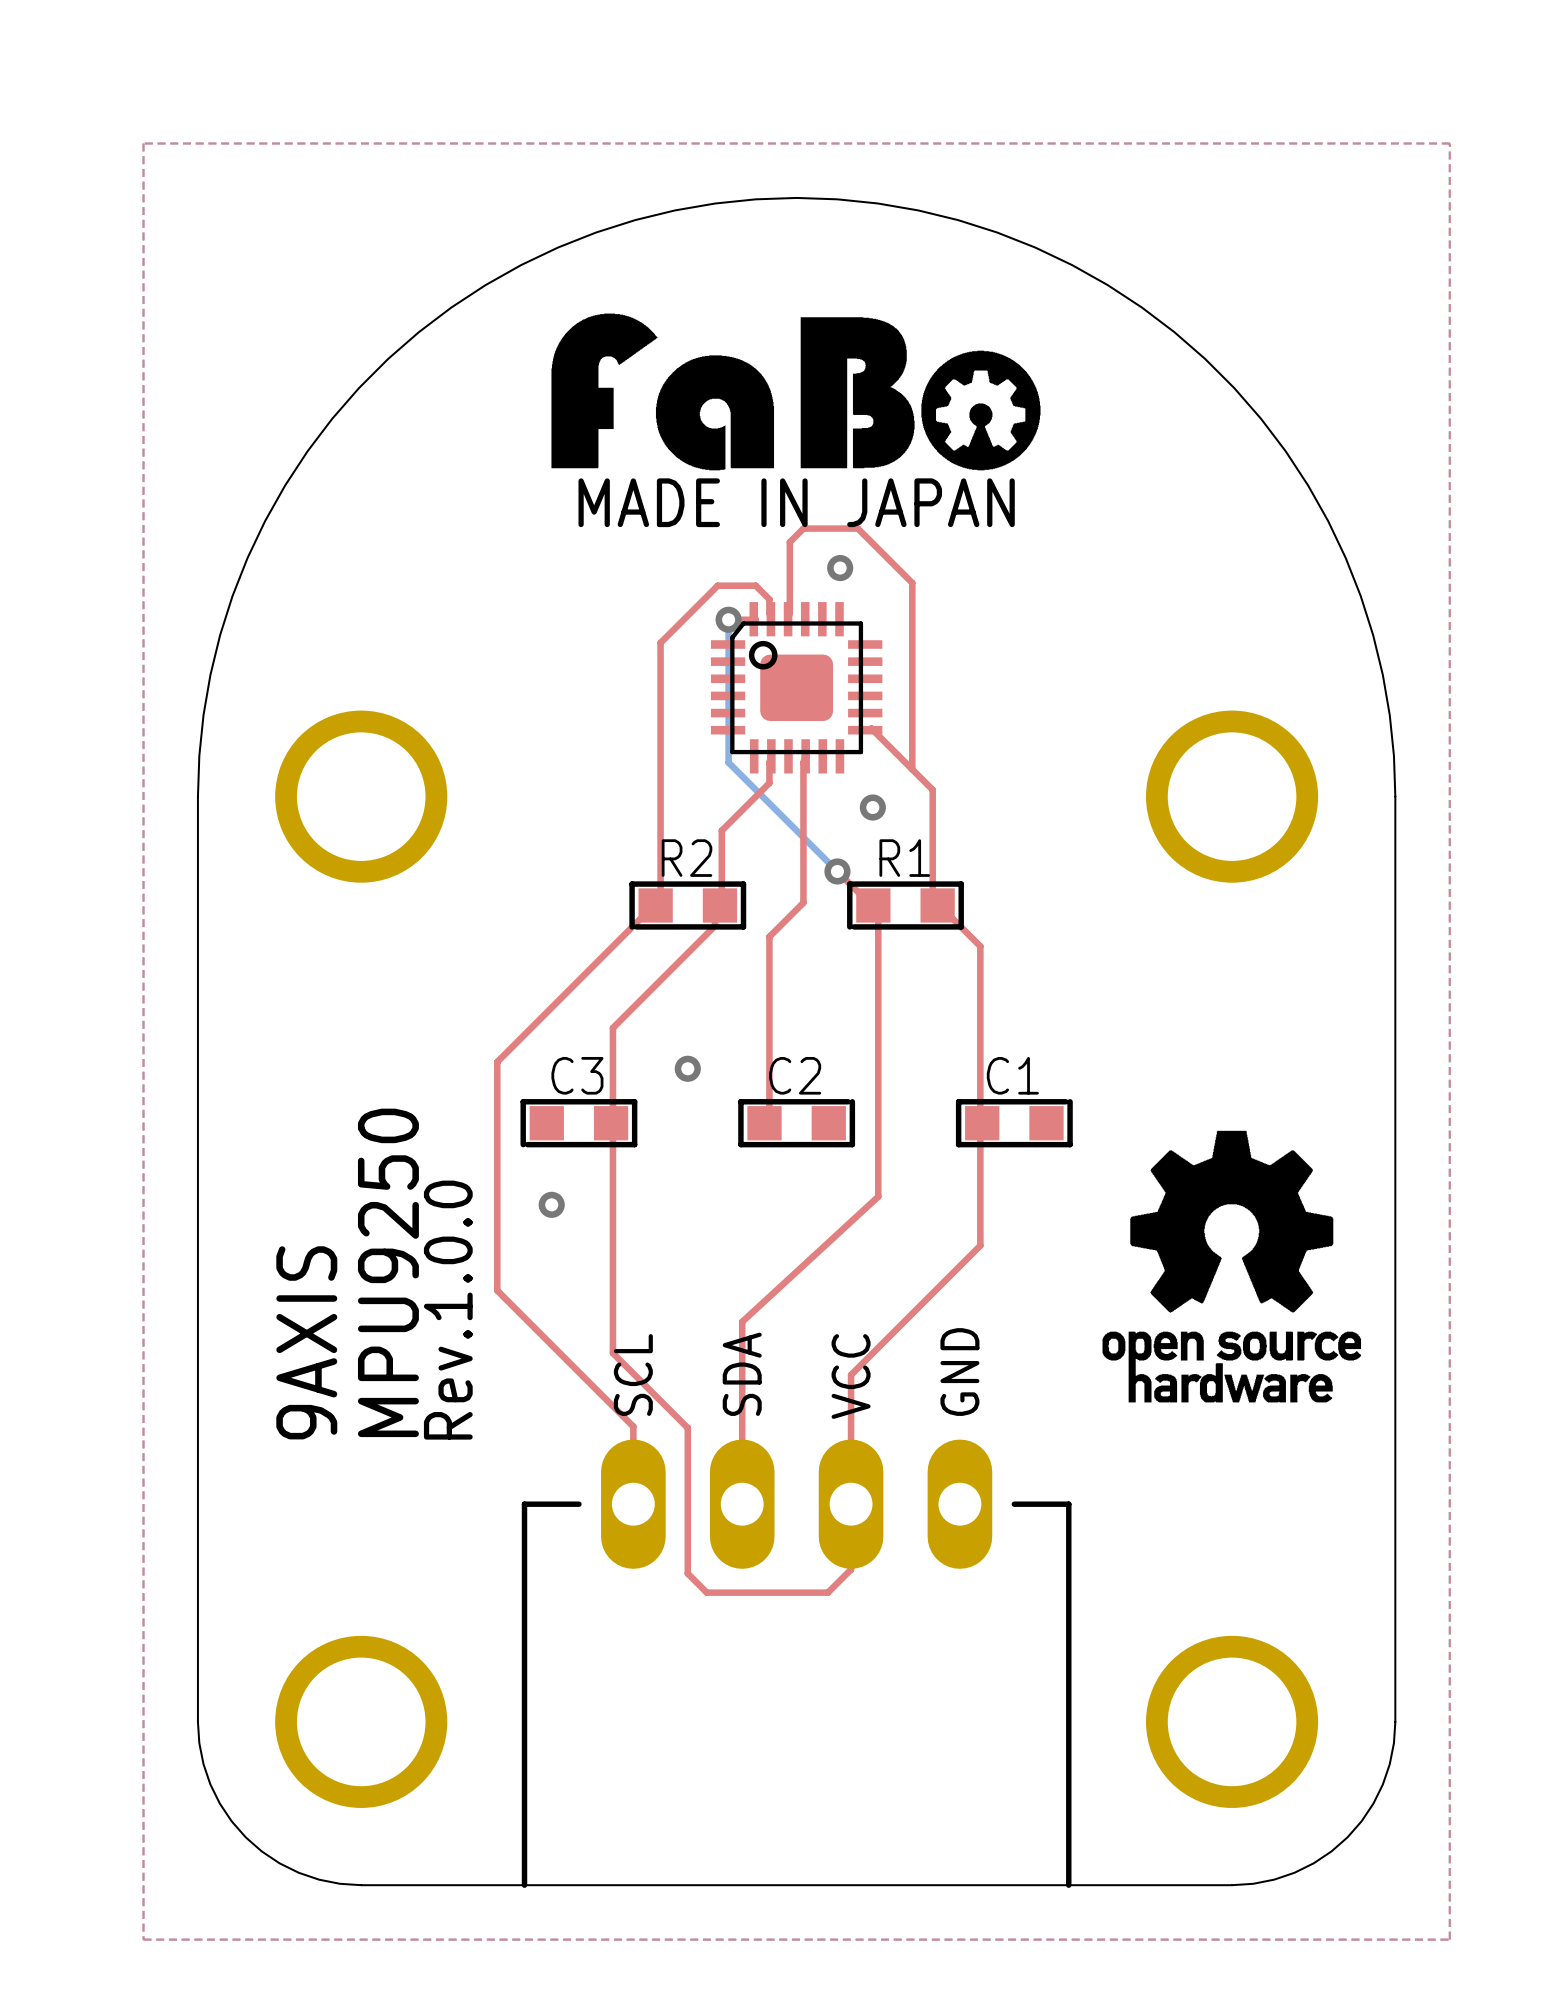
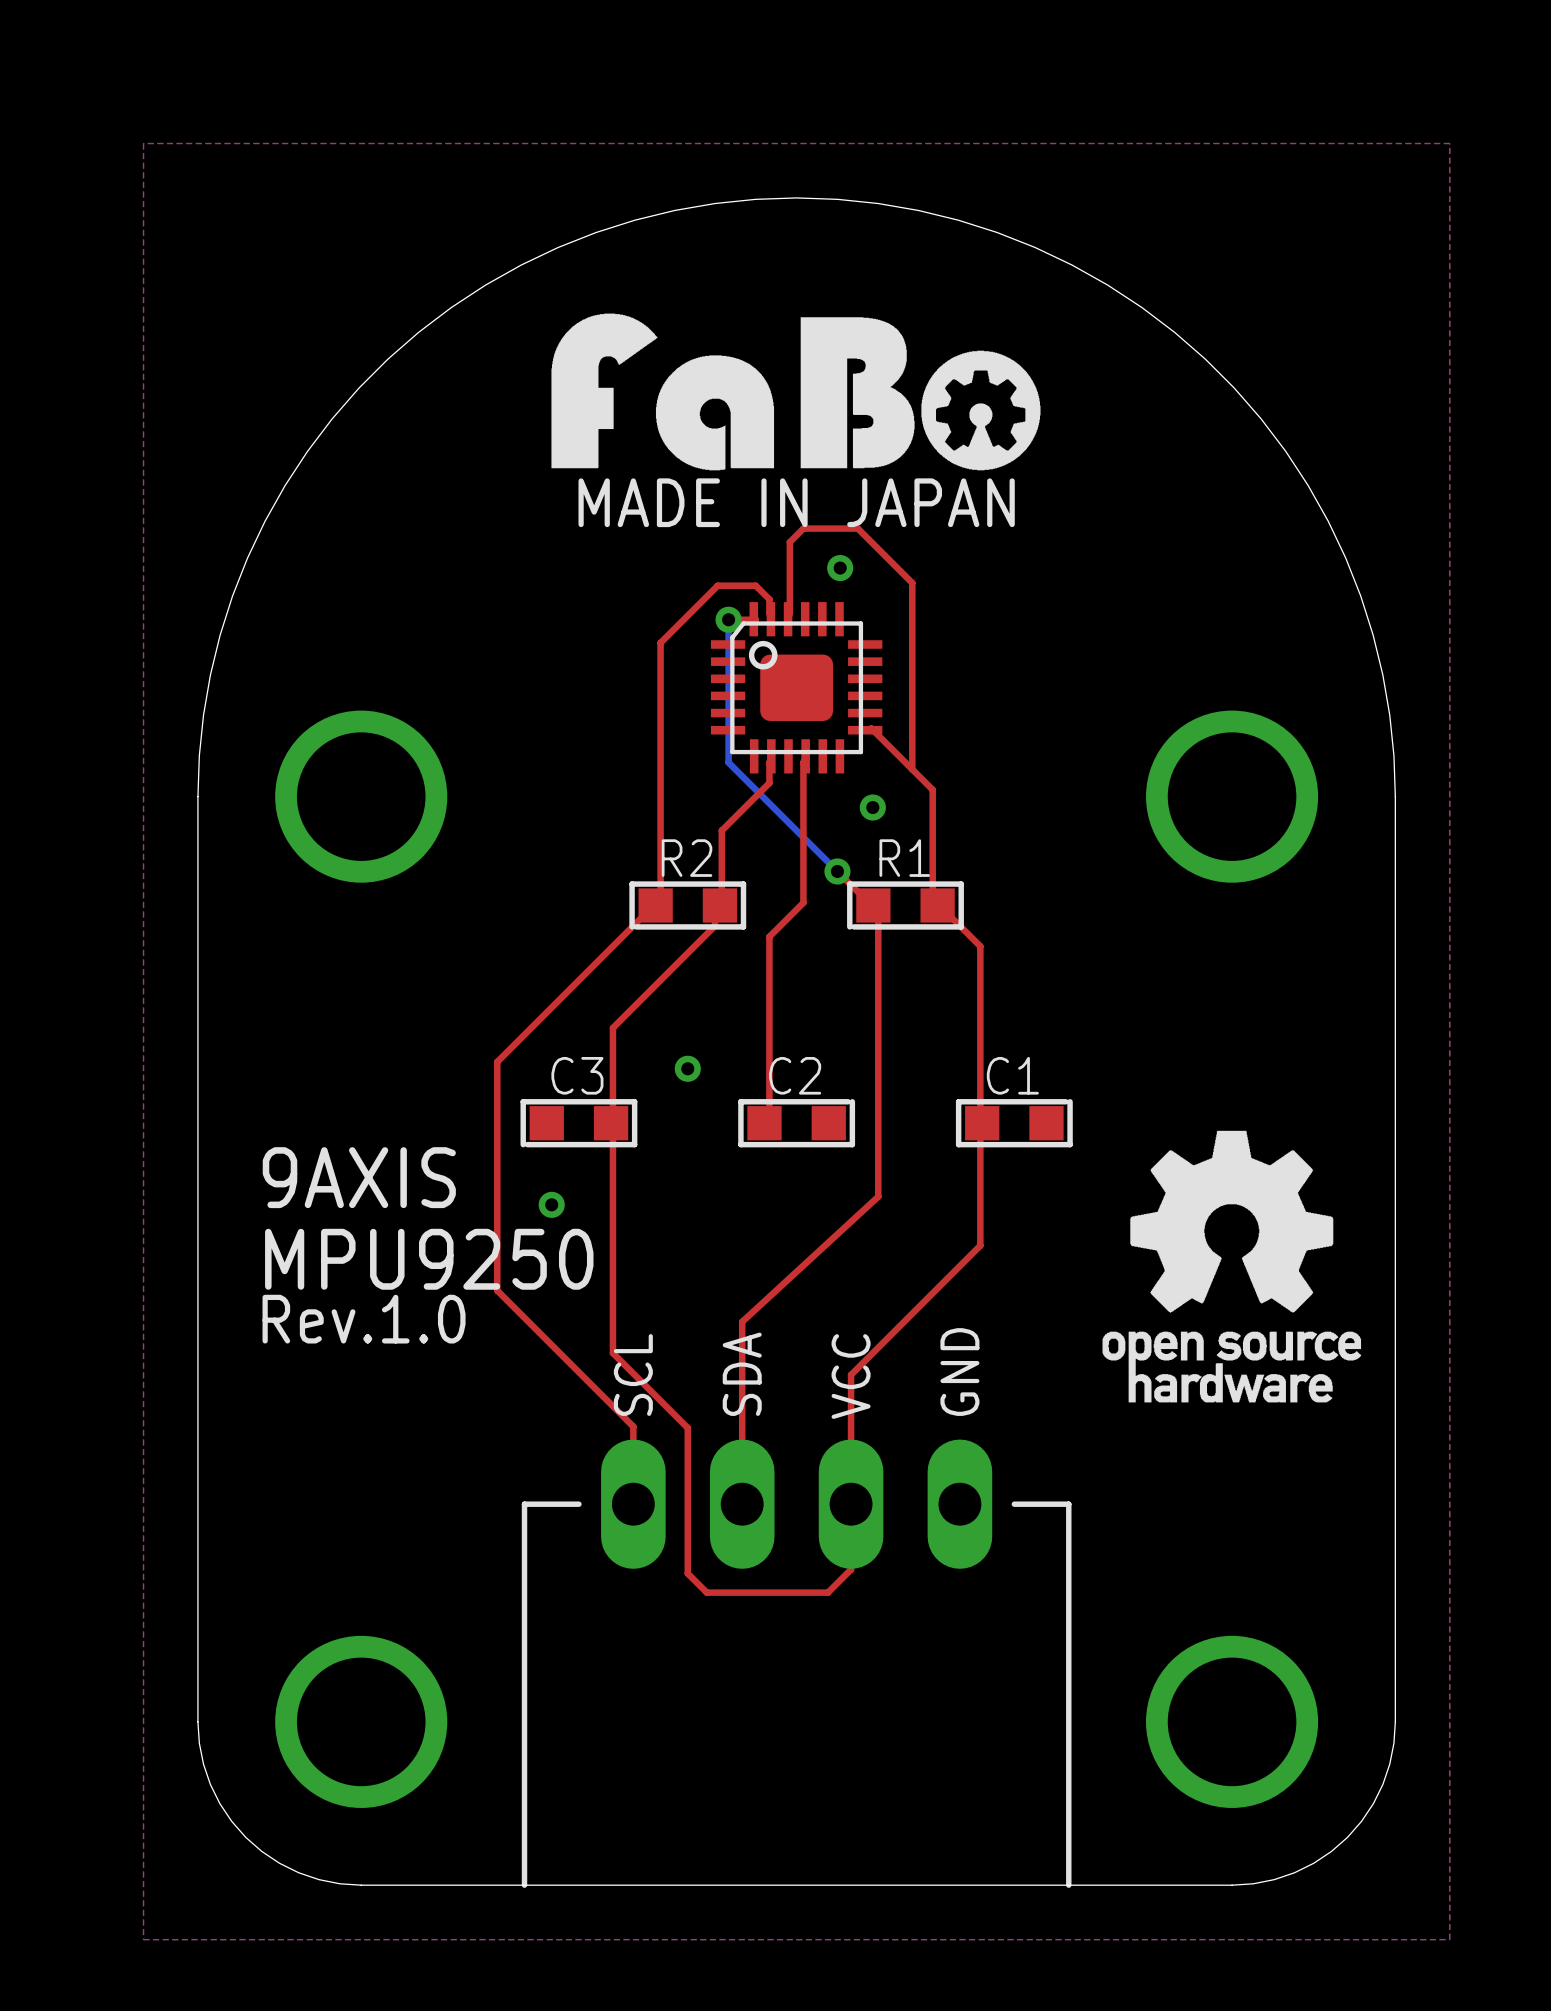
text rotation: 0° (388, 1272) -> 90° clockwise (429, 1259)
text: Rev.1.0.0 (448, 1310) -> Rev.1.0 (364, 1319)
text rotation: 0° (306, 1342) -> 90° clockwise (359, 1177)

